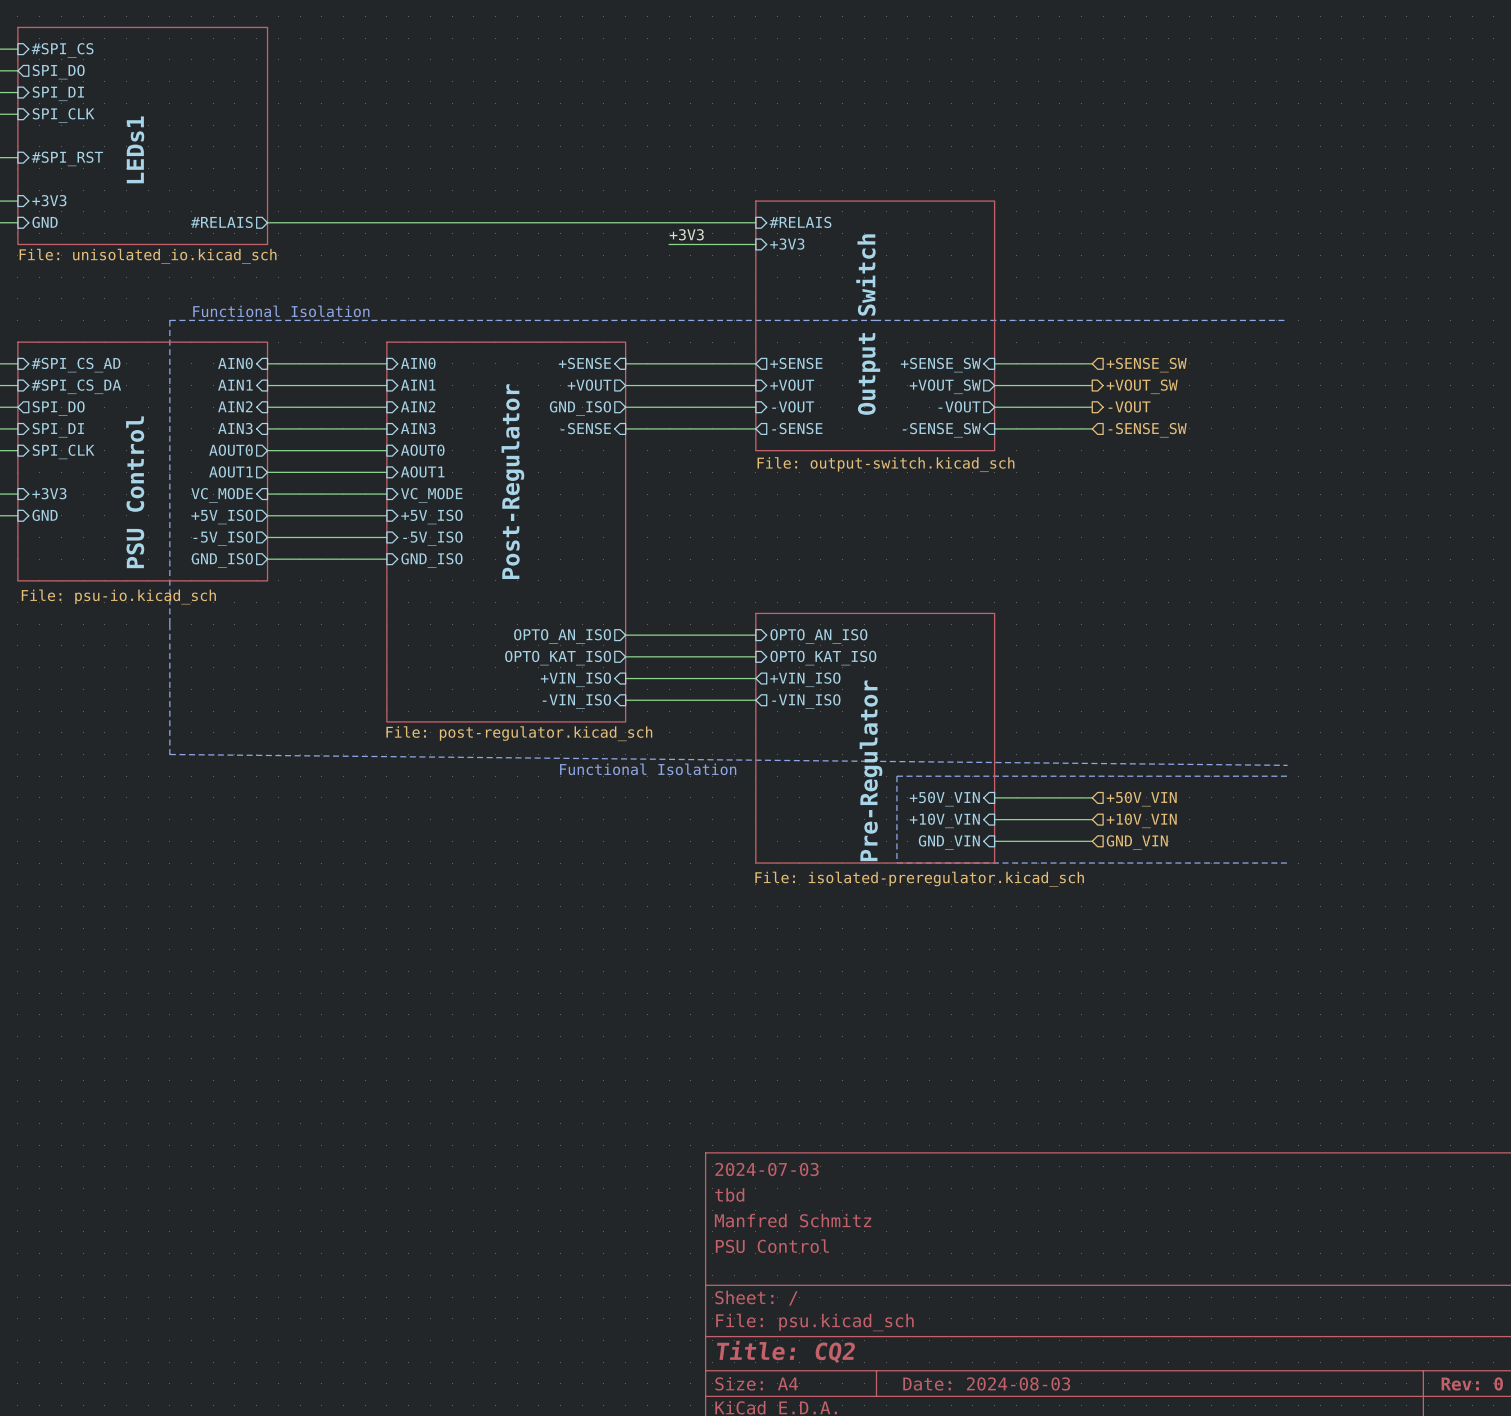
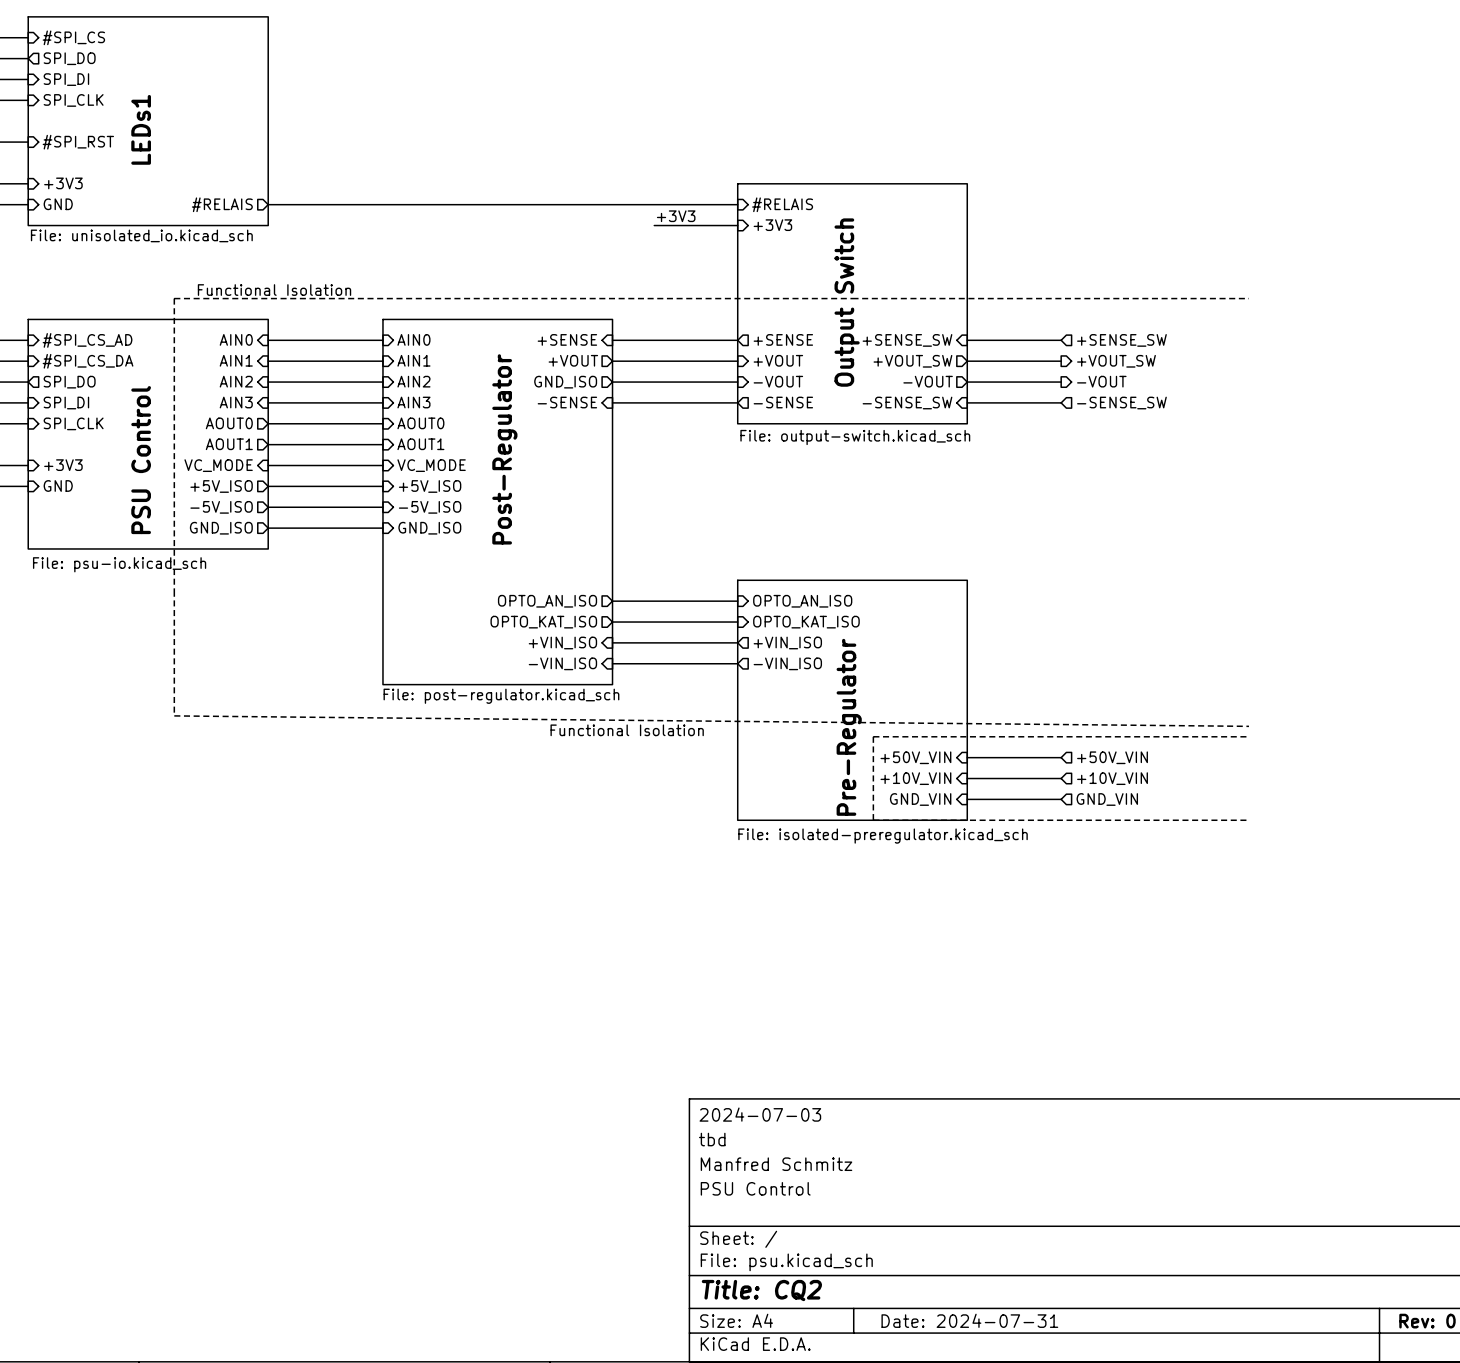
title block: Date: 2024-08-03 (986, 1383) -> Date: 2024-07-31 (969, 1320)

